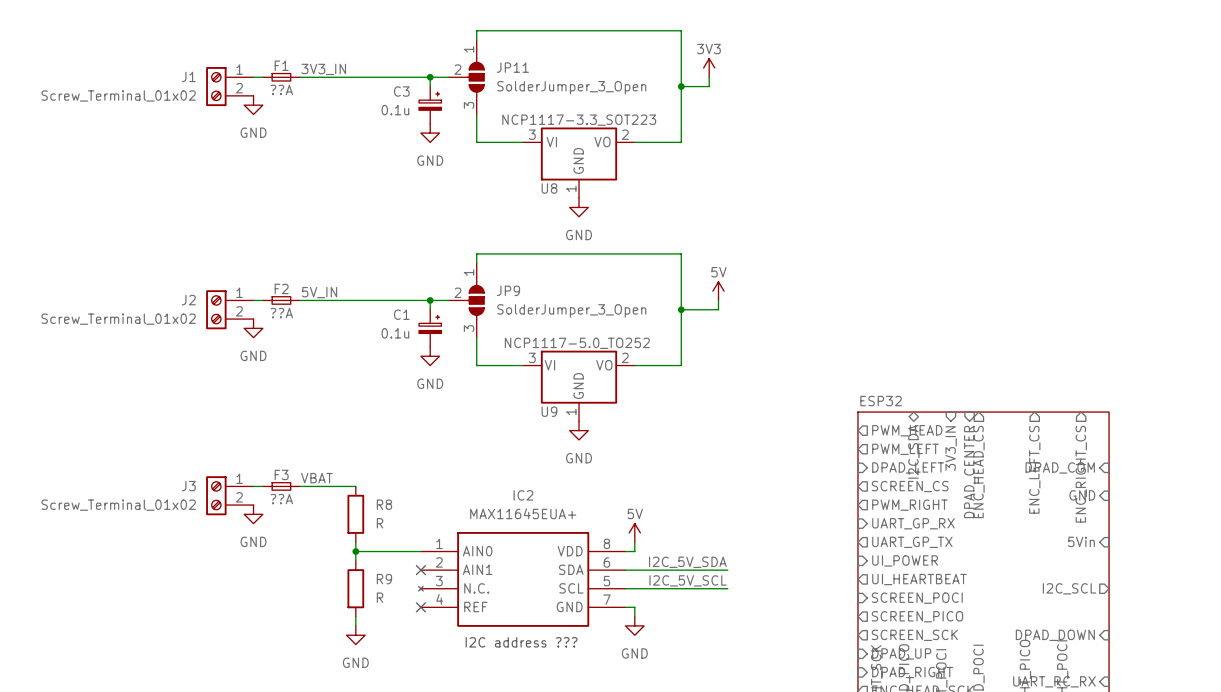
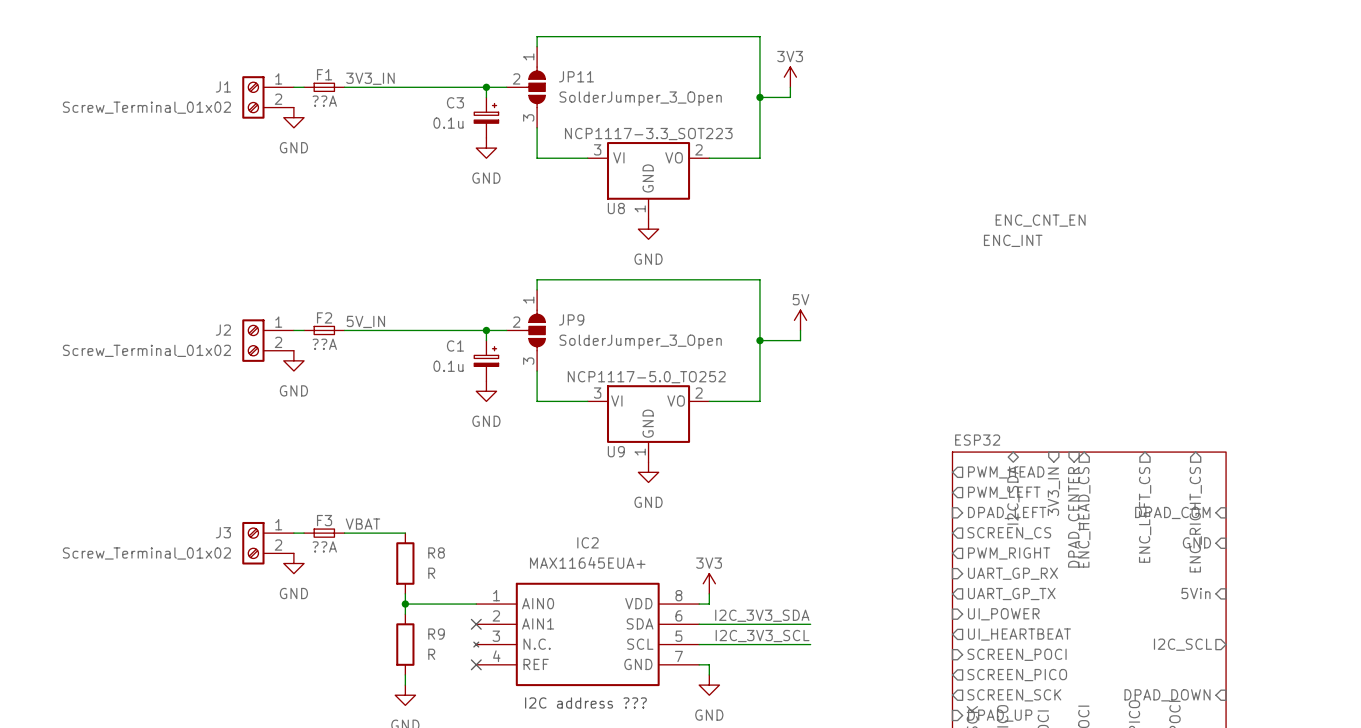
label: none -> ENC_CNT_EN (1040, 220)
label: none -> ENC_INT (1013, 240)
power symbol: 5V (634, 532) -> 3V3 (709, 583)
label: I2C_5V_SDA (687, 562) -> I2C_3V3_SDA (762, 615)
label: I2C_5V_SCL (688, 580) -> I2C_3V3_SCL (762, 636)

